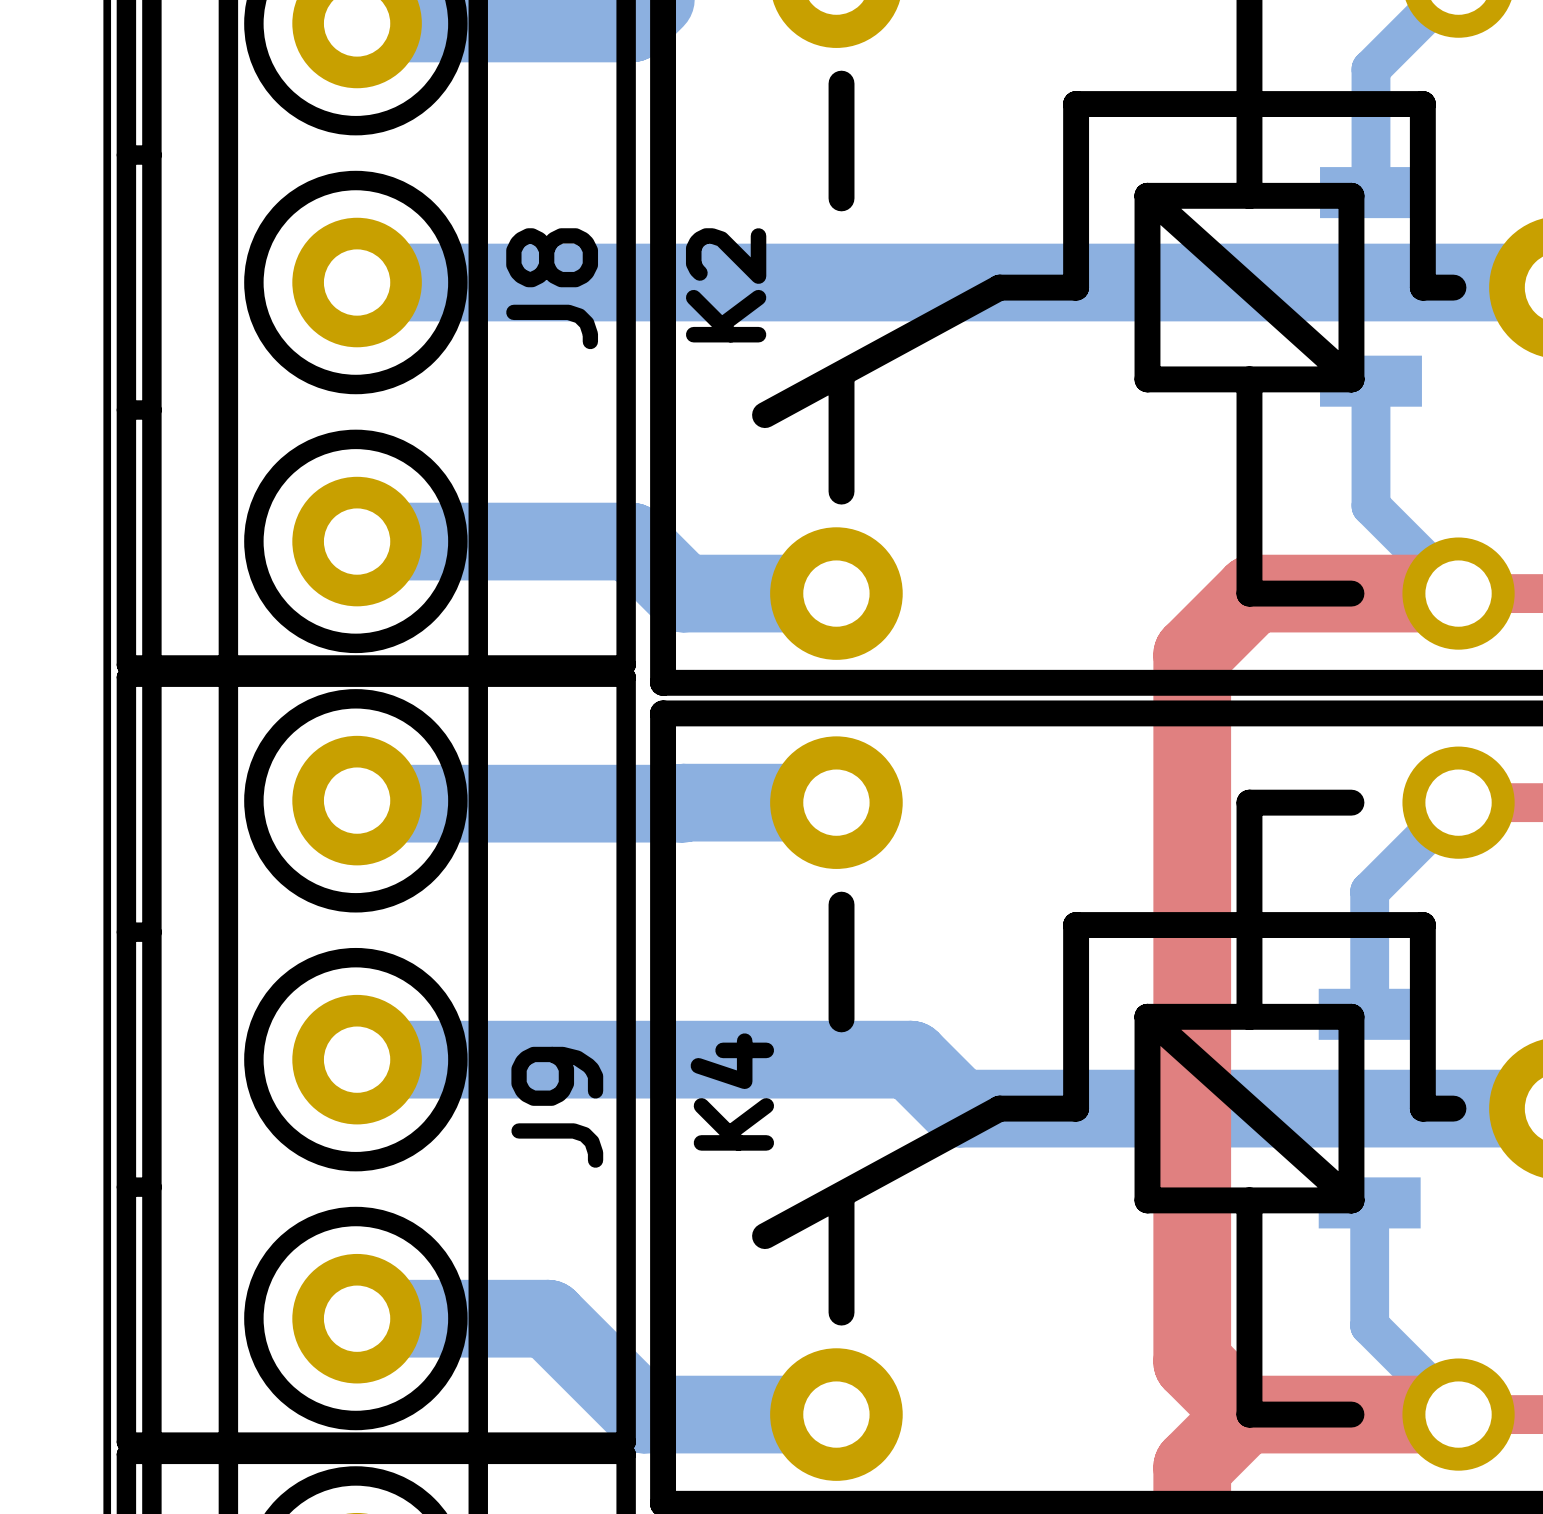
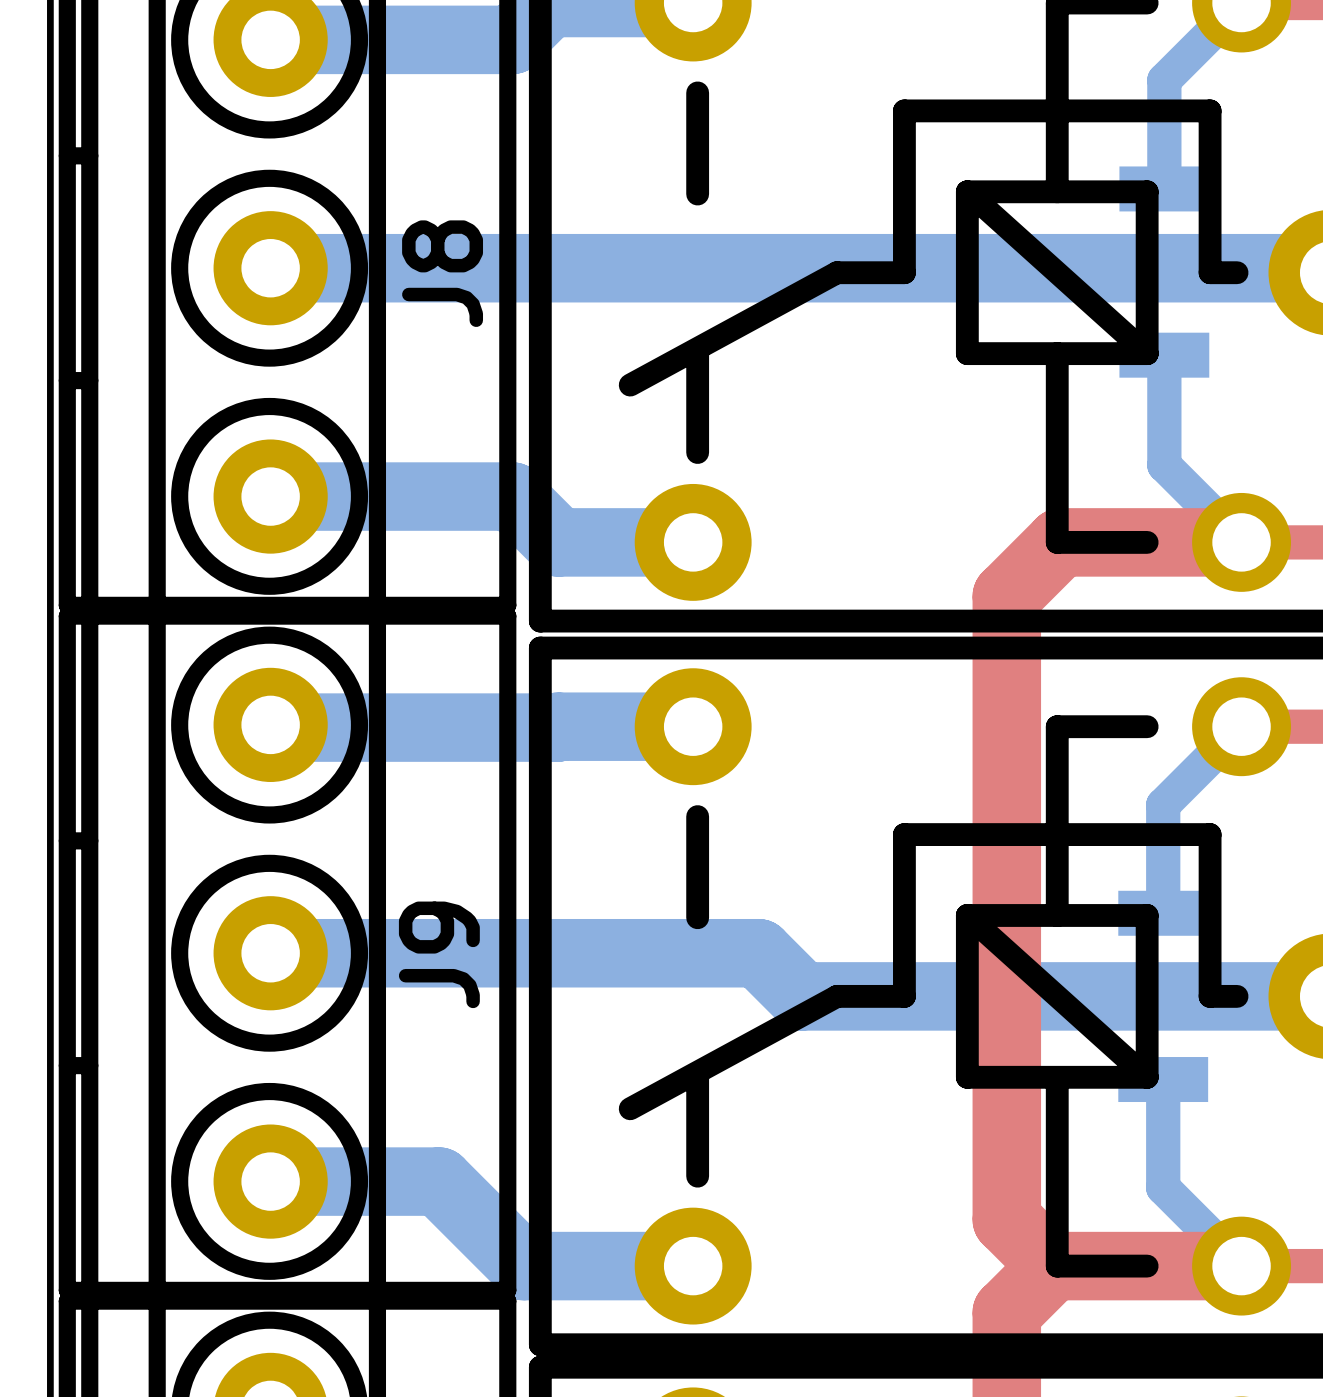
K2 name: K2 (726, 285) -> none
K4 name: K4 (732, 1092) -> none
J9 name position: J9 (557, 1107) -> J9 (439, 954)

